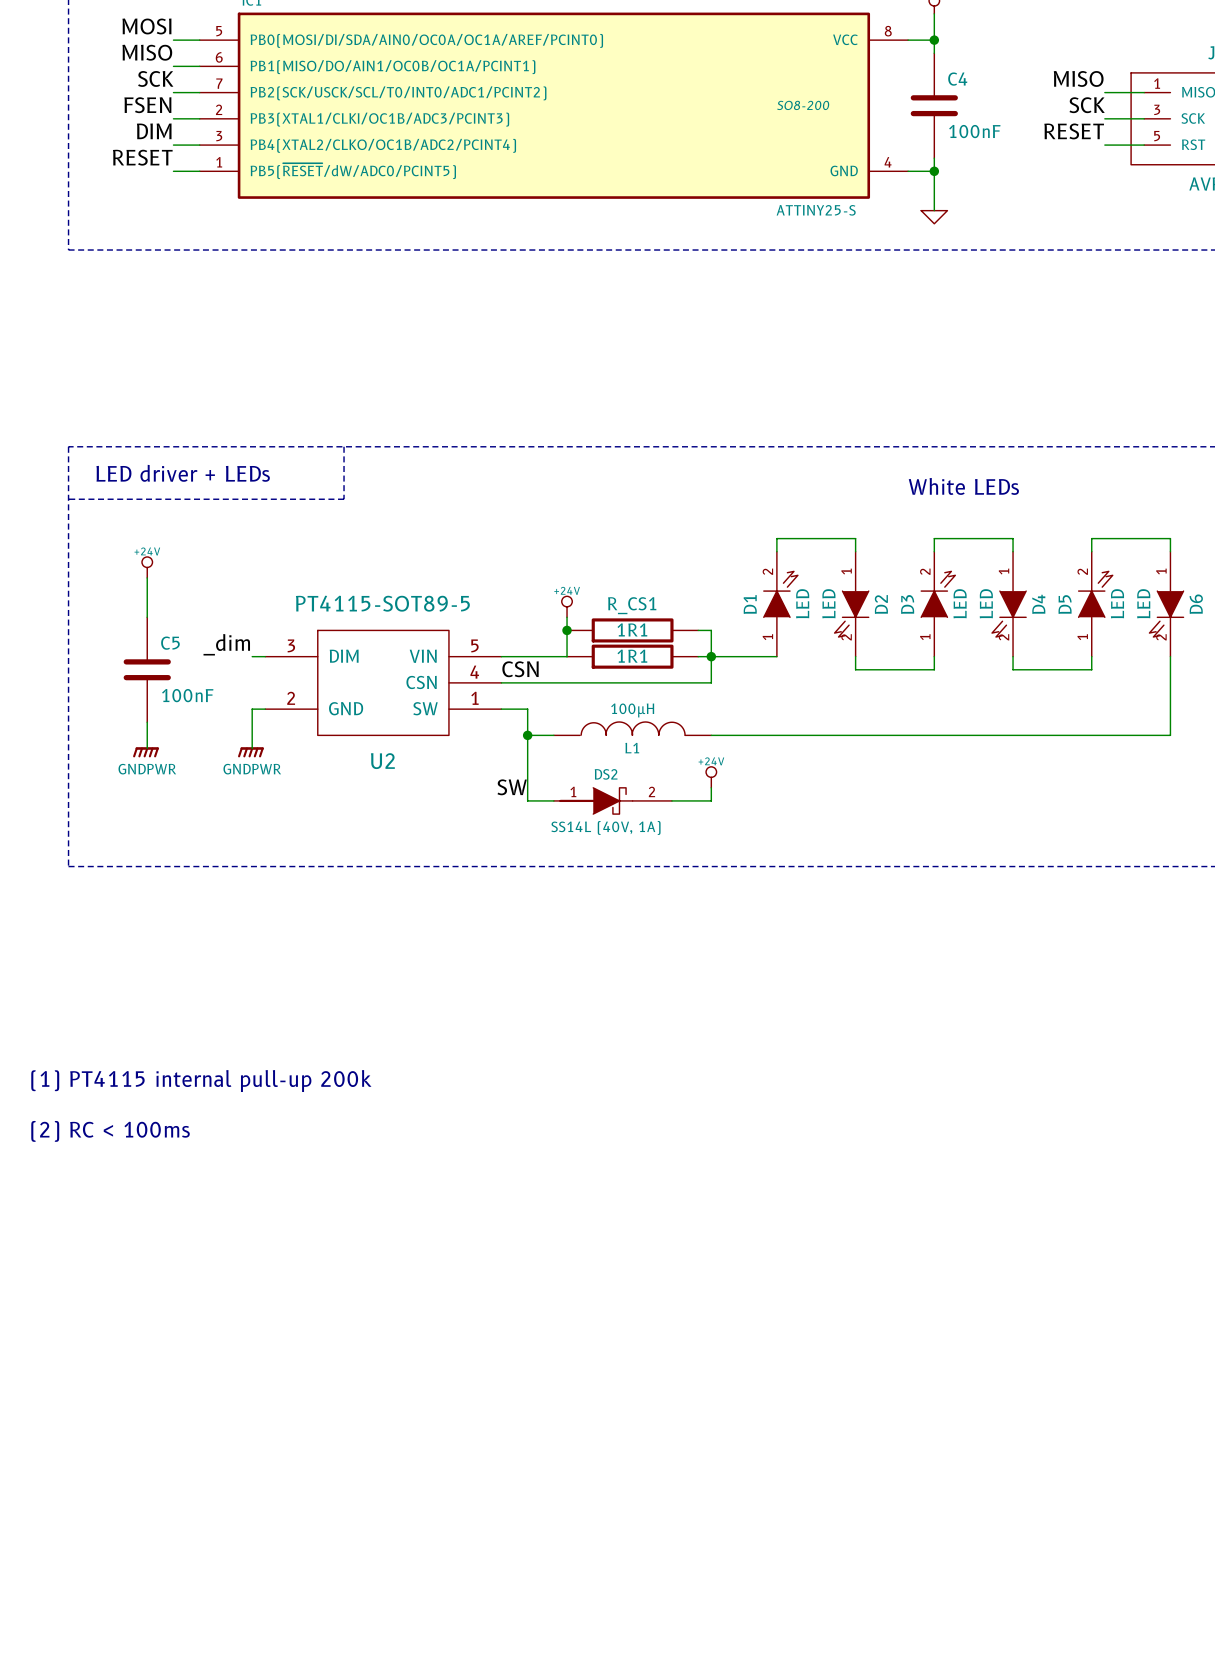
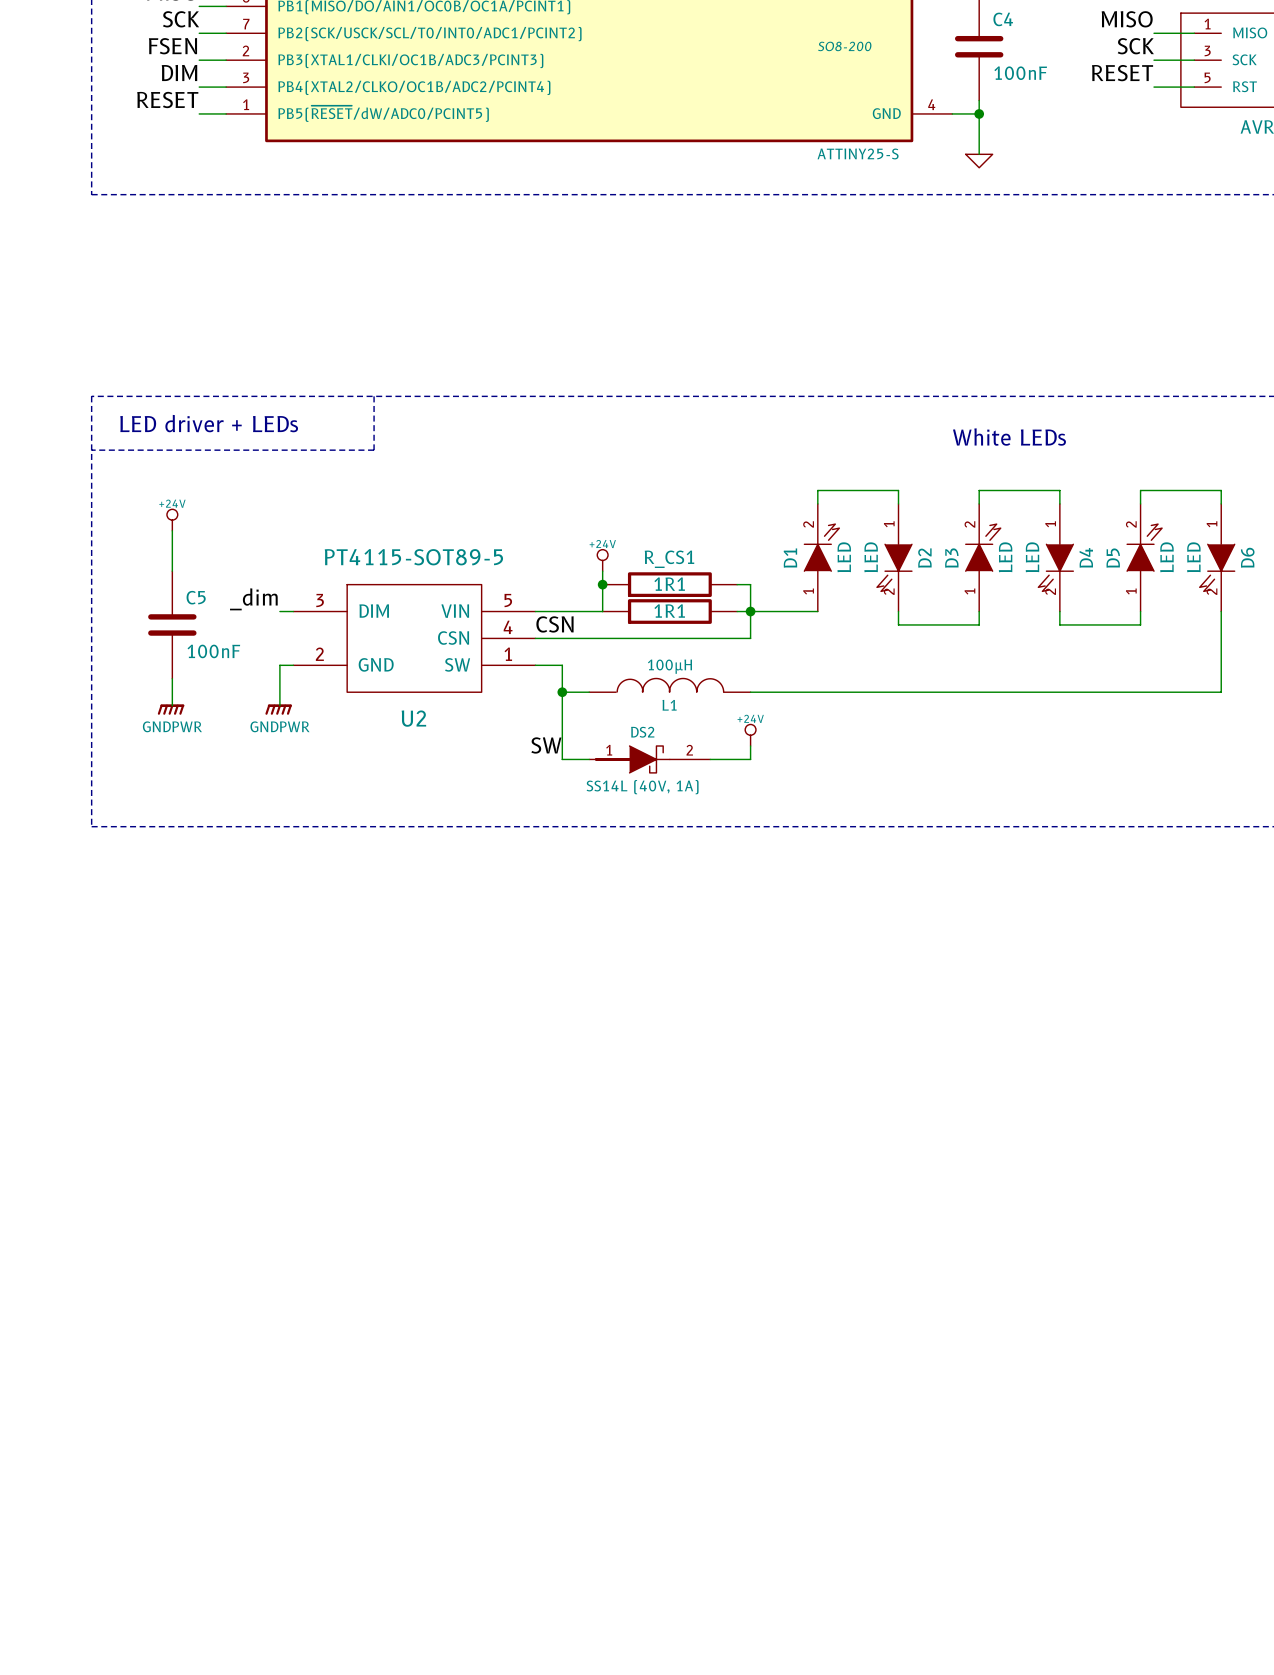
text: (1) PT4115 internal pull-up 200k (201, 1081) -> none
text: (2) RC < 100ms (110, 1131) -> none

